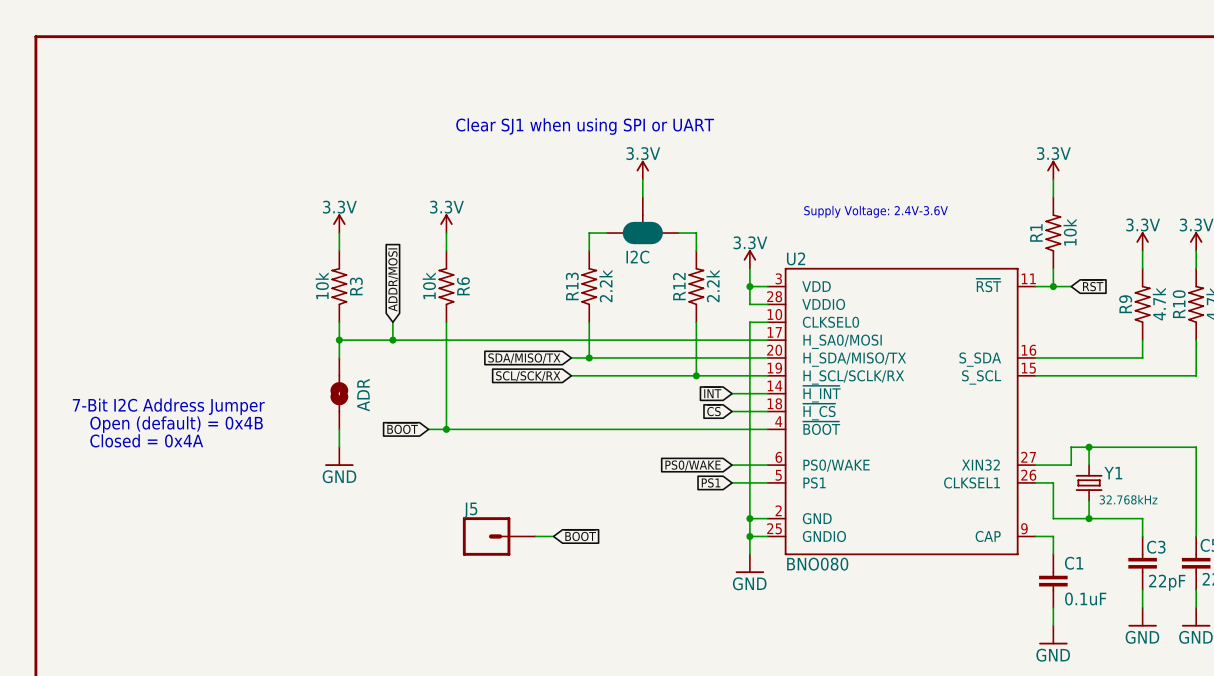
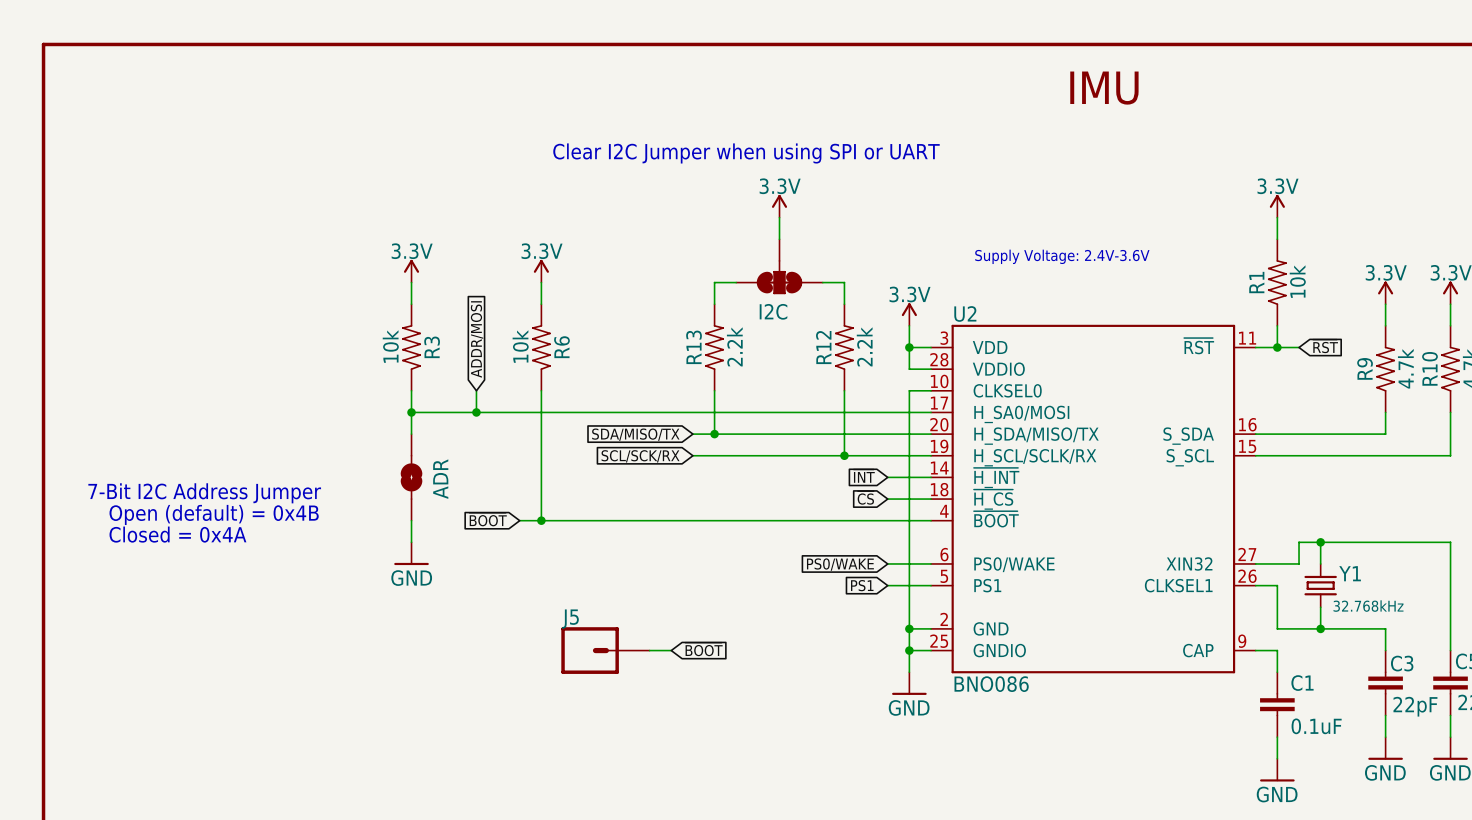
text: none -> IMU (1104, 88)
text: Clear SJ1 when using SPI or UART (585, 126) -> Clear I2C Jumper when using SPI or UART (746, 153)
I2C symbol: [607, 197, 679, 245] -> [736, 239, 823, 295]
U2 value: BNO080 (817, 564) -> BNO086 (991, 684)

